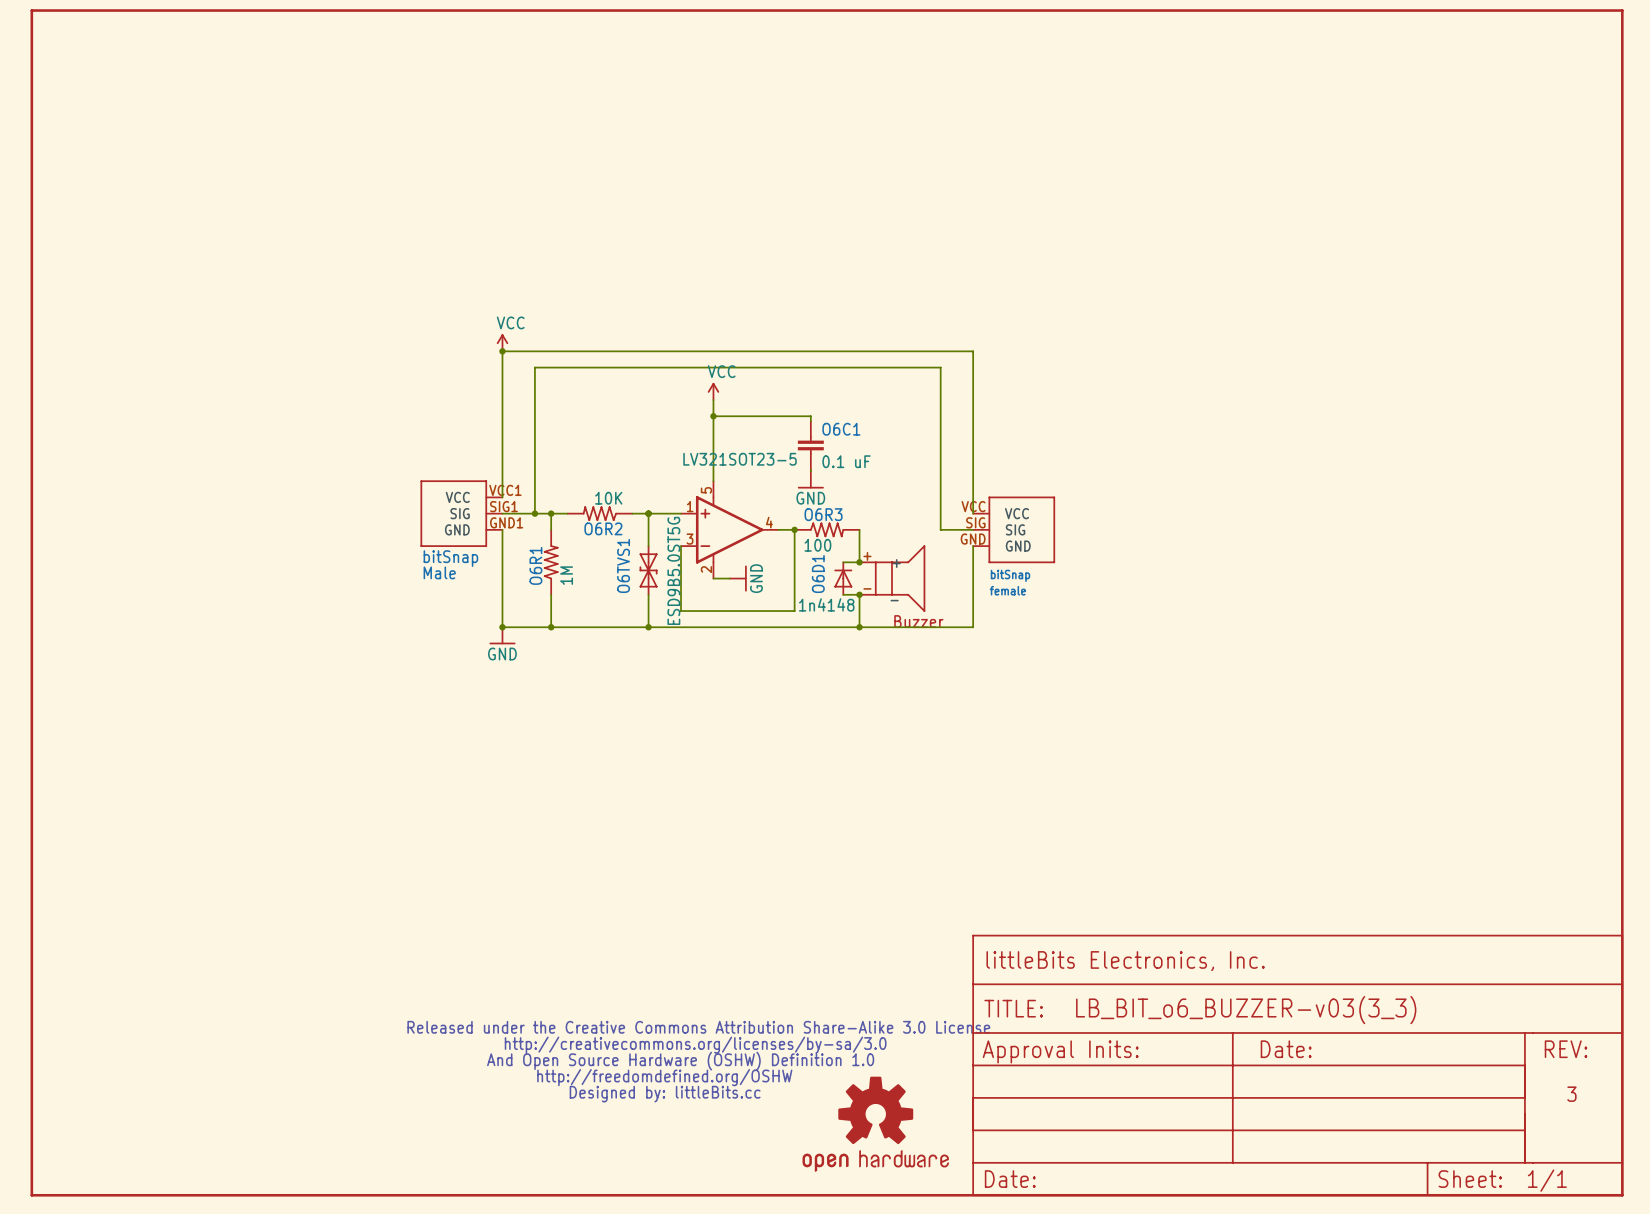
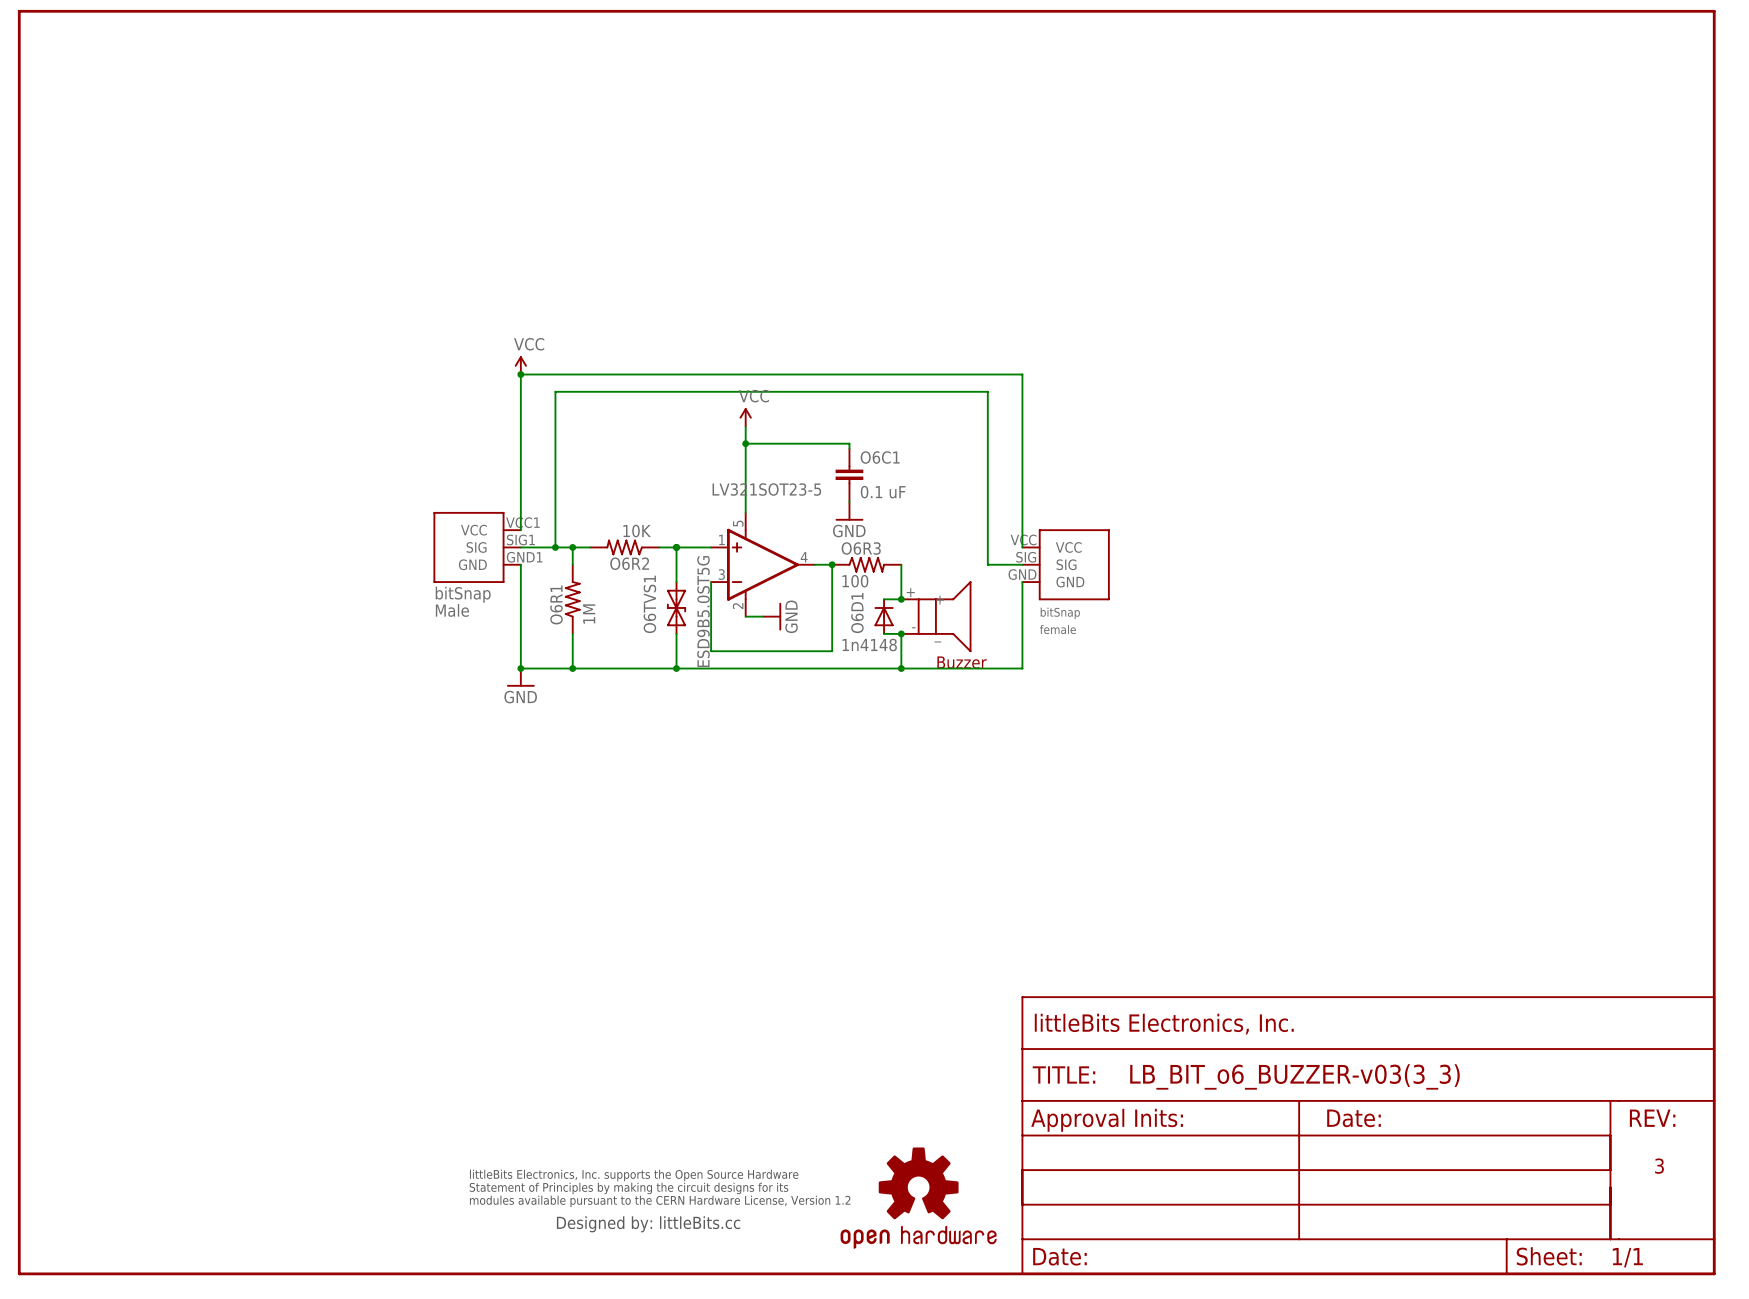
part: (698, 1061) -> none
part: none -> (660, 1201)

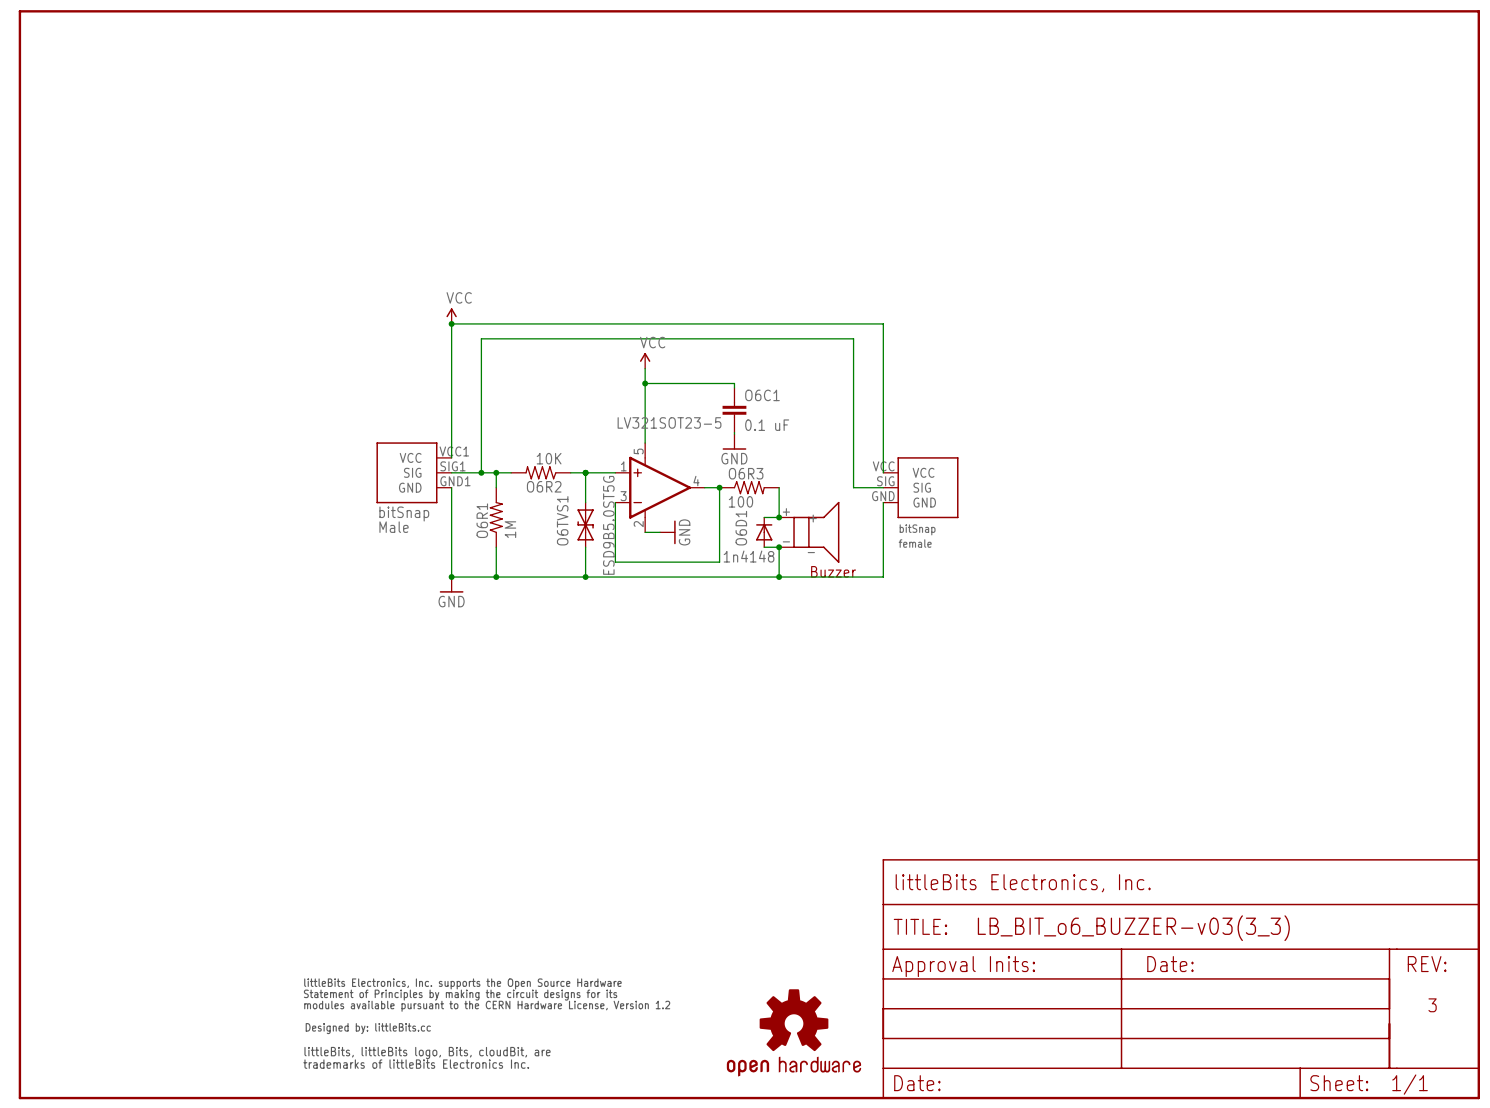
part: none -> (486, 1023)
part: (660, 1201) -> none

